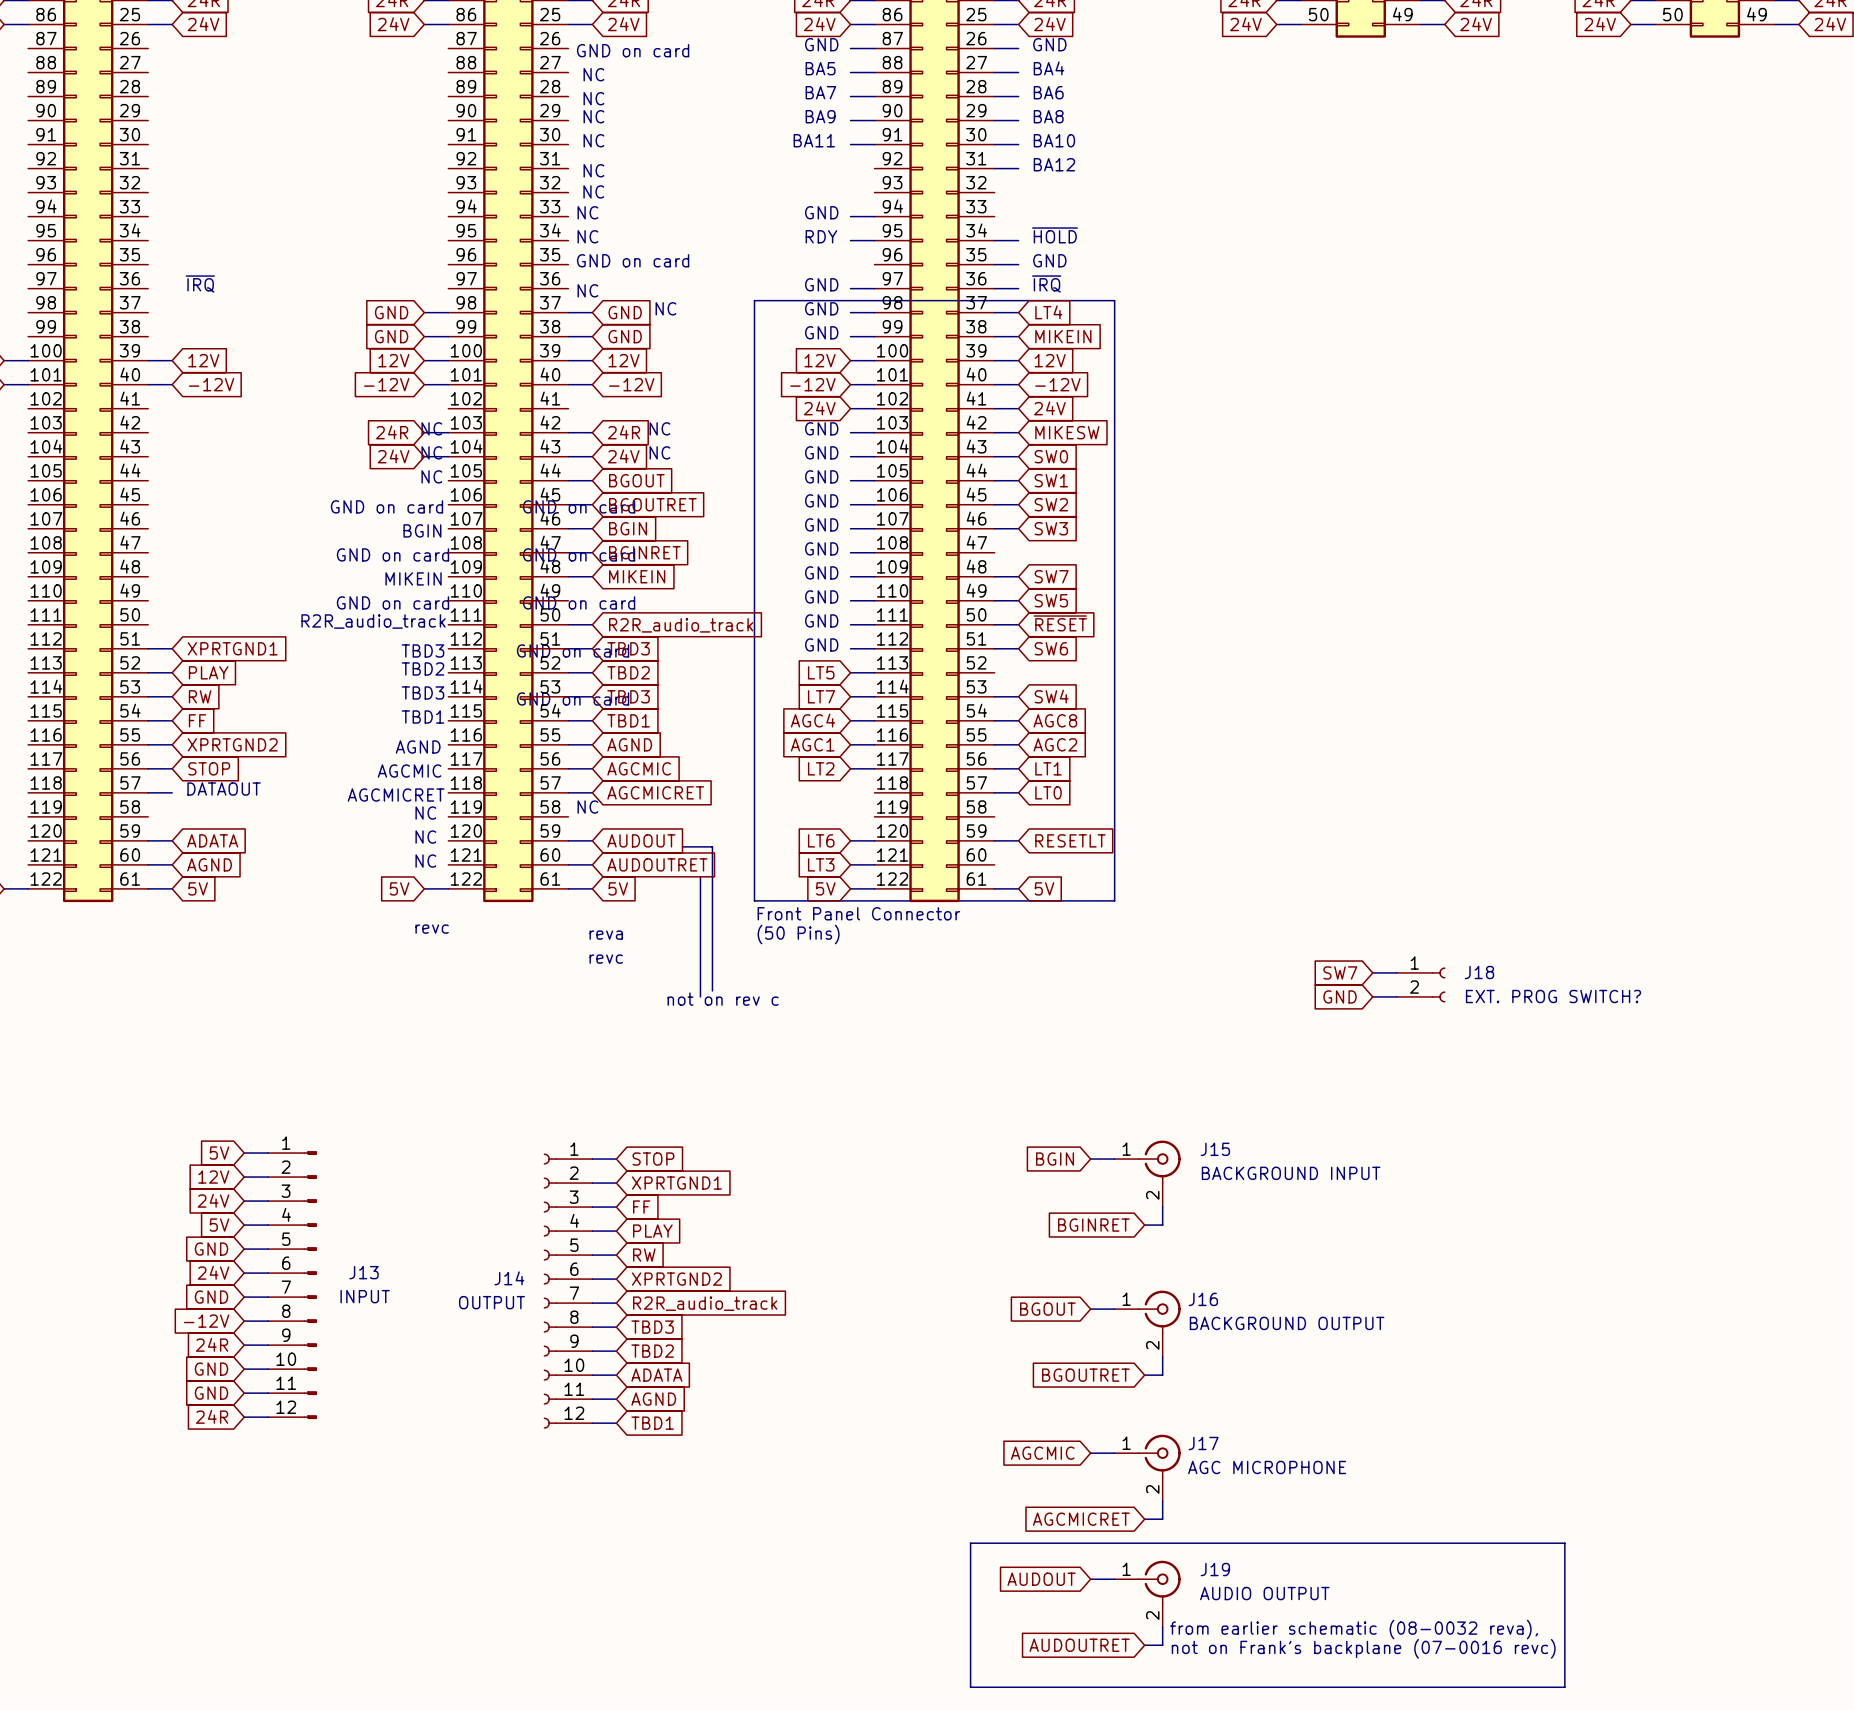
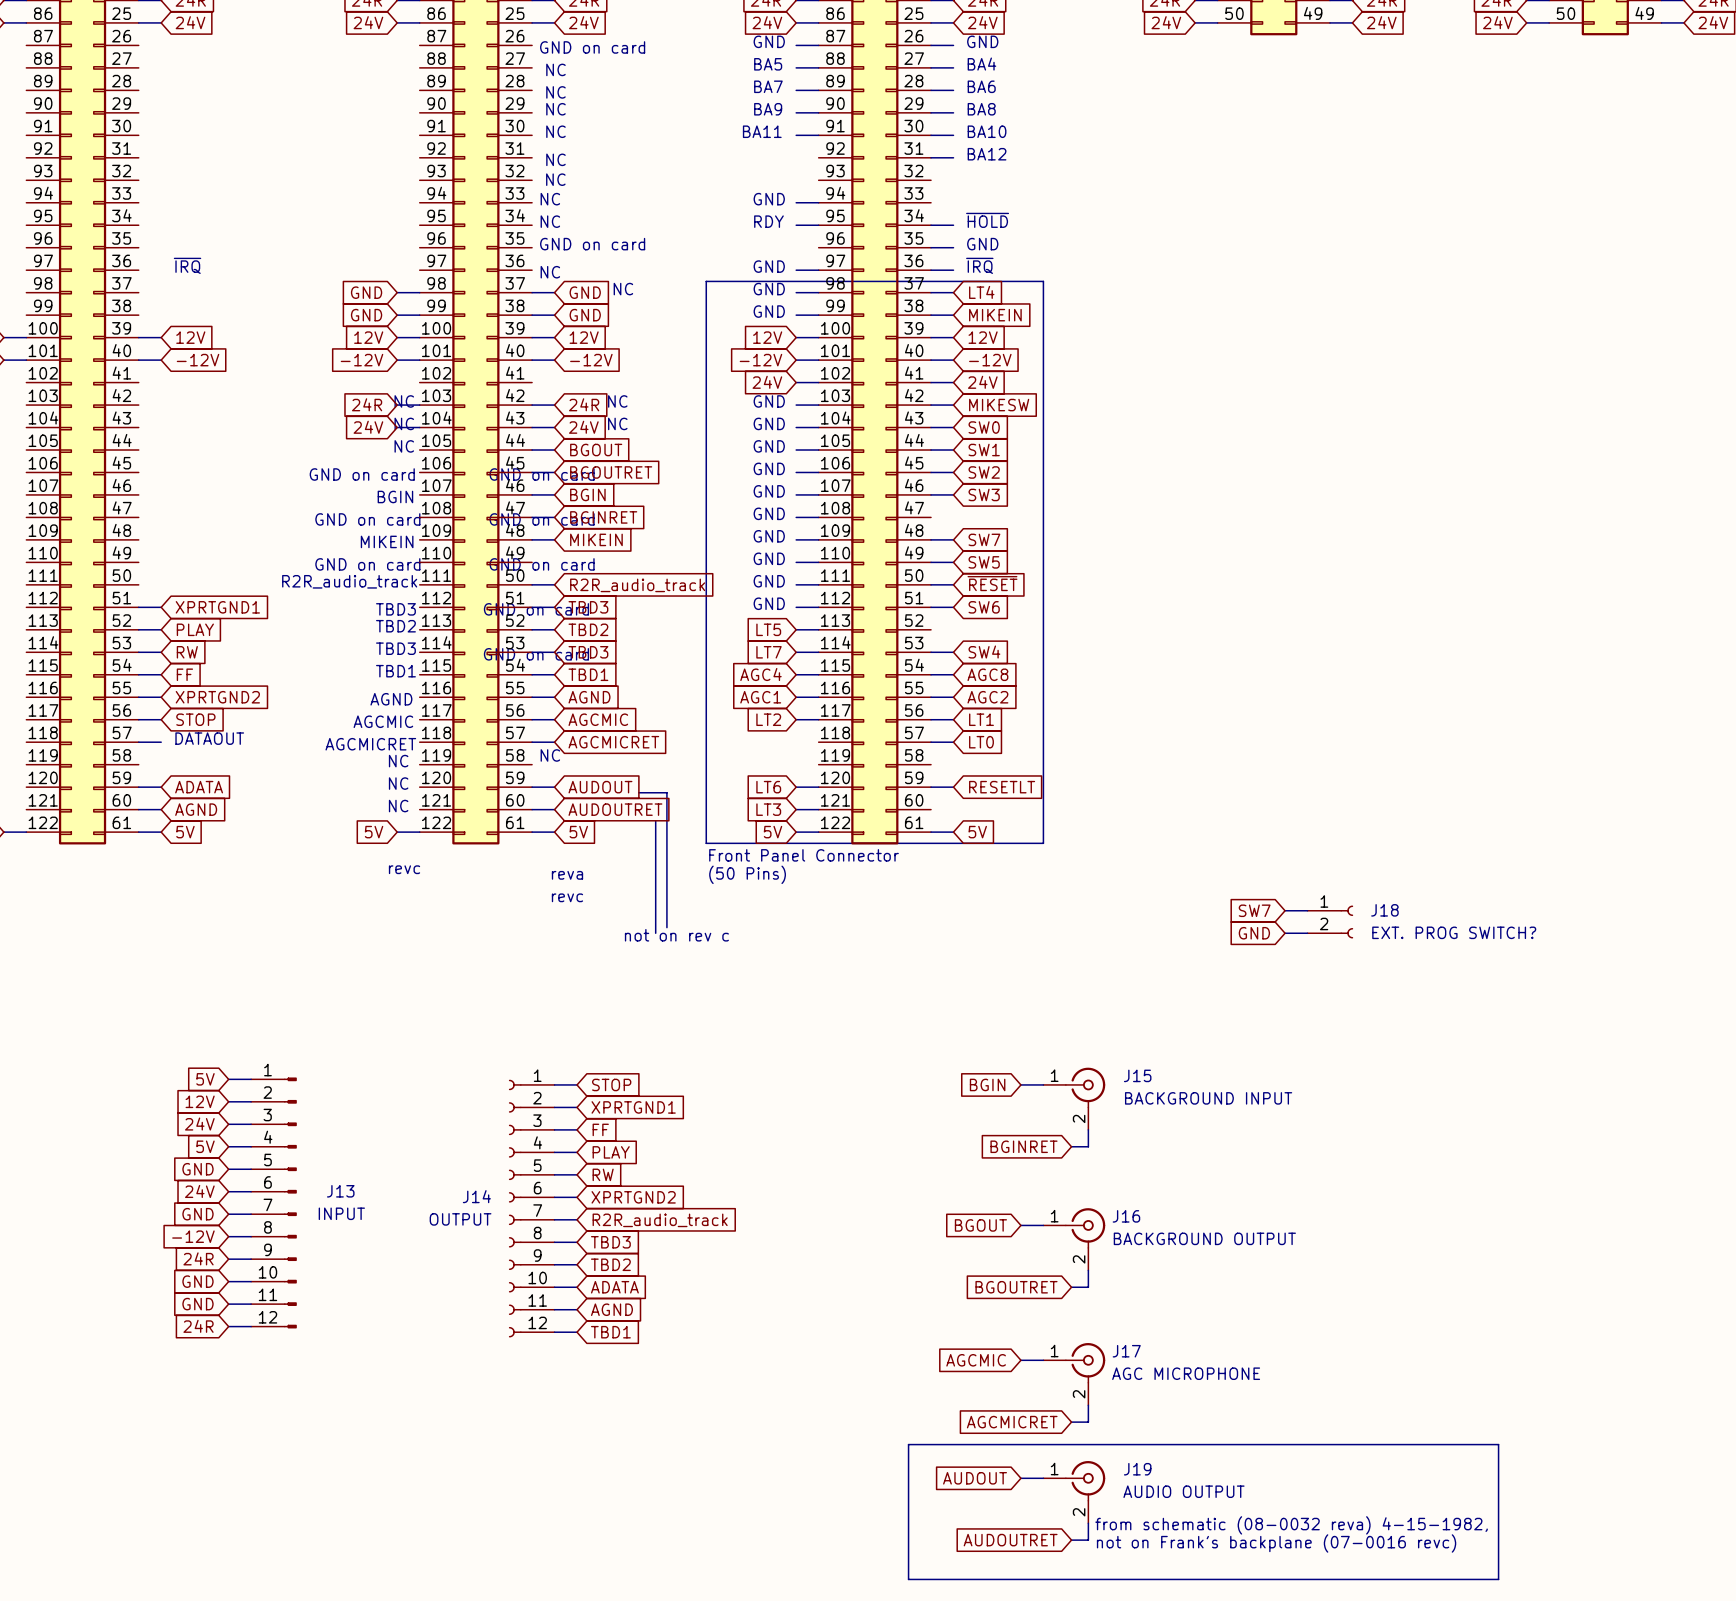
line: (1564, 1543) (1564, 1687) -> (1464, 1444) (1498, 1444) (1498, 1579) (1464, 1579)
text: from earlier schematic (08-0032 reva), (1353, 1629) -> from schematic (08-0032 reva) 4-15-1982, (1291, 1525)

